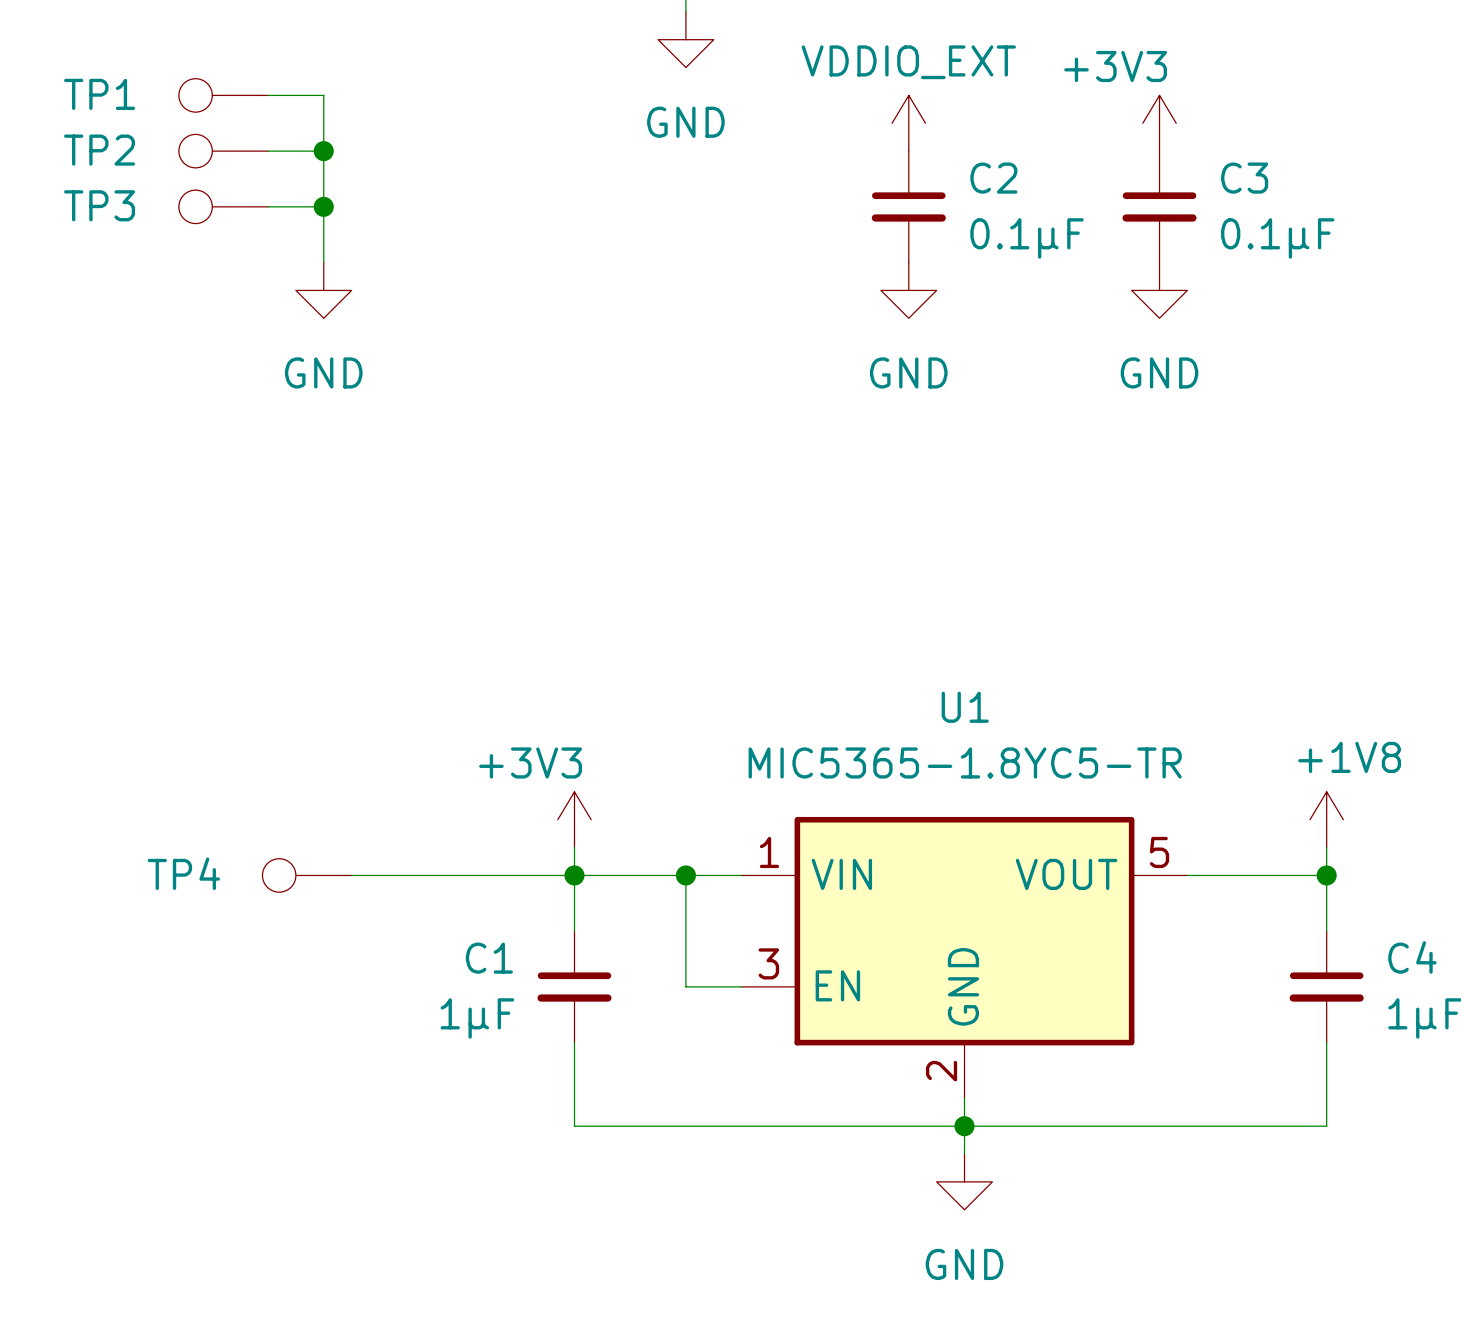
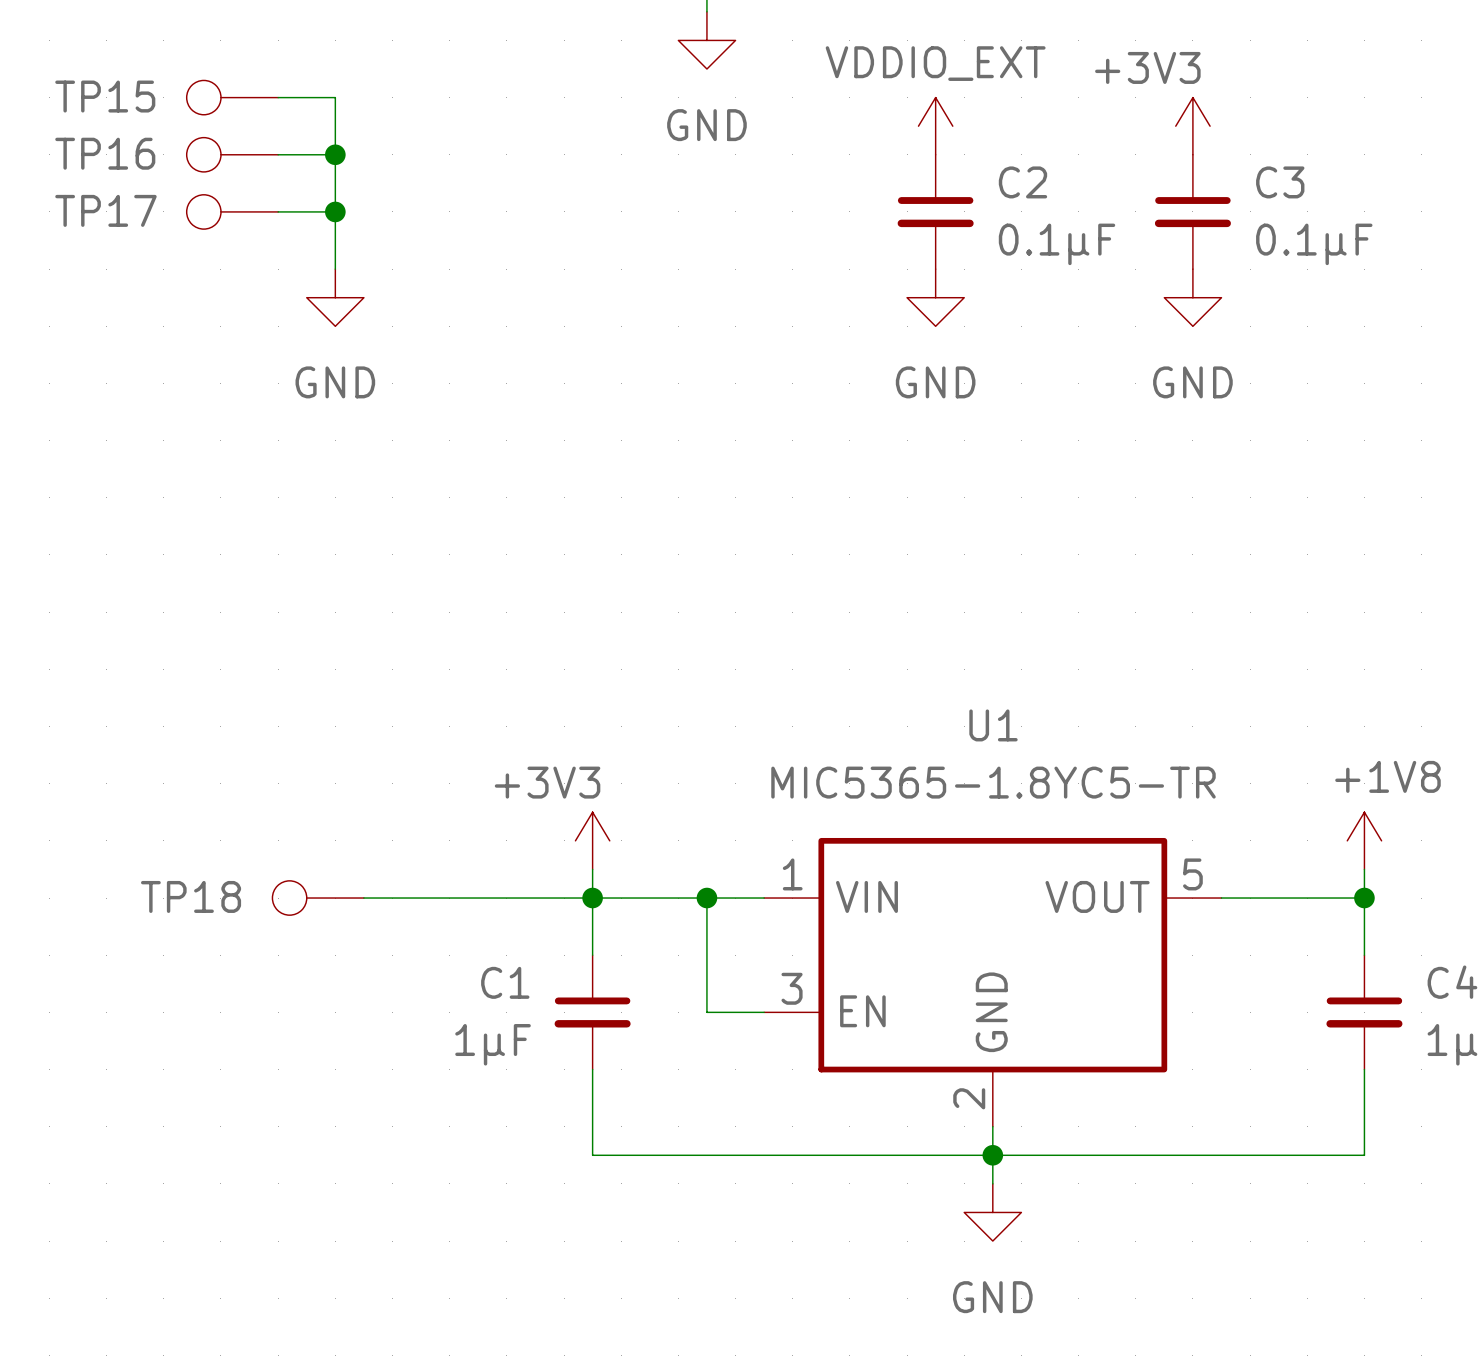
TP1 name: TP1 (99, 94) -> TP15 (105, 96)
TP2 name: TP2 (99, 150) -> TP16 (105, 153)
TP3 name: TP3 (99, 205) -> TP17 (105, 210)
TP4 name: TP4 (183, 873) -> TP18 (191, 896)

